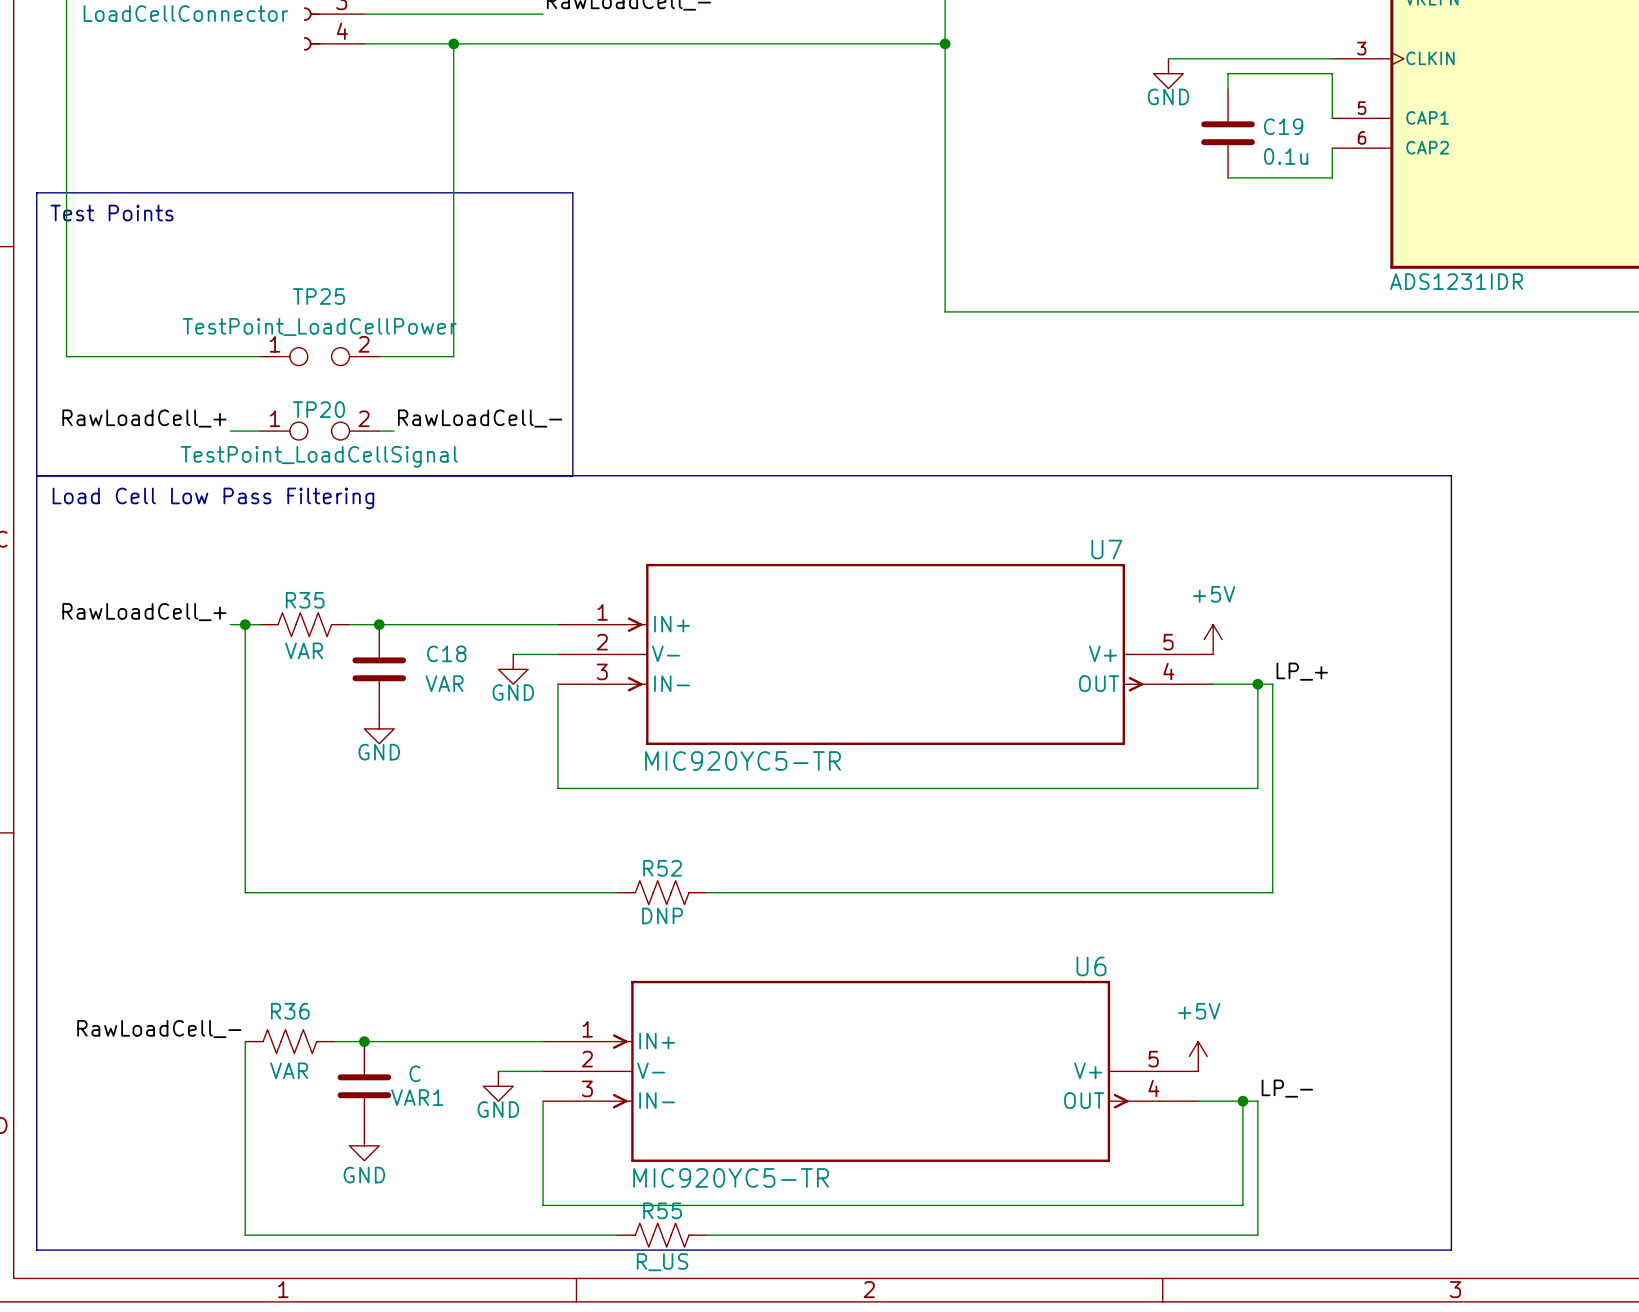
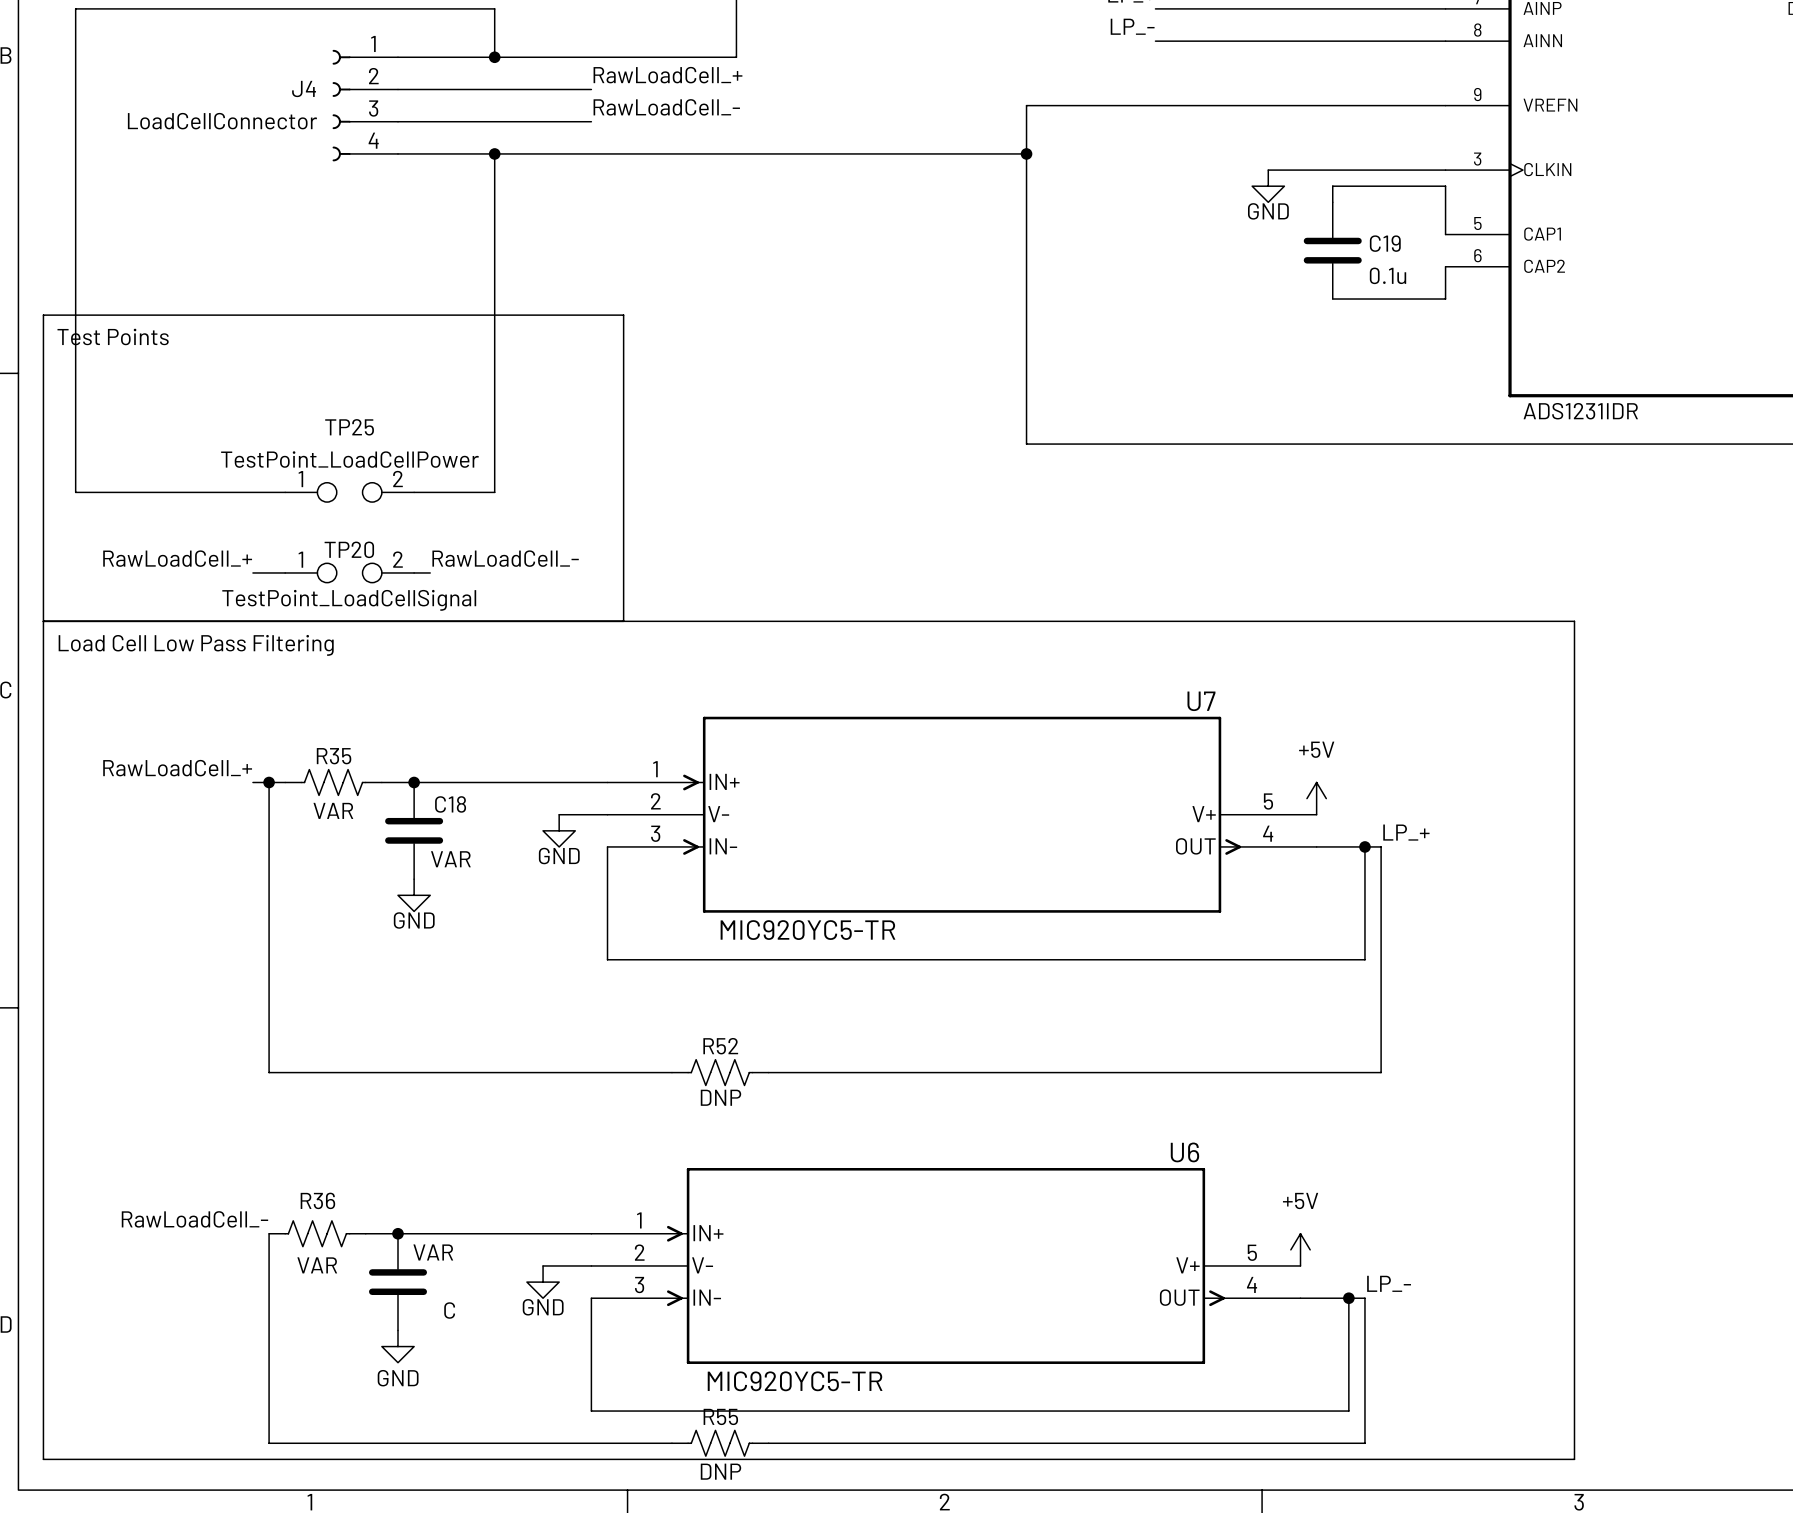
C18 name position: C18 (446, 653) -> C18 (450, 804)
C18 value position: VAR (444, 683) -> VAR (450, 859)
VAR1 value: C (414, 1073) -> VAR (433, 1252)
VAR1 name: VAR1 (417, 1097) -> C (449, 1310)
R55 value: R_US (662, 1262) -> DNP (720, 1471)

